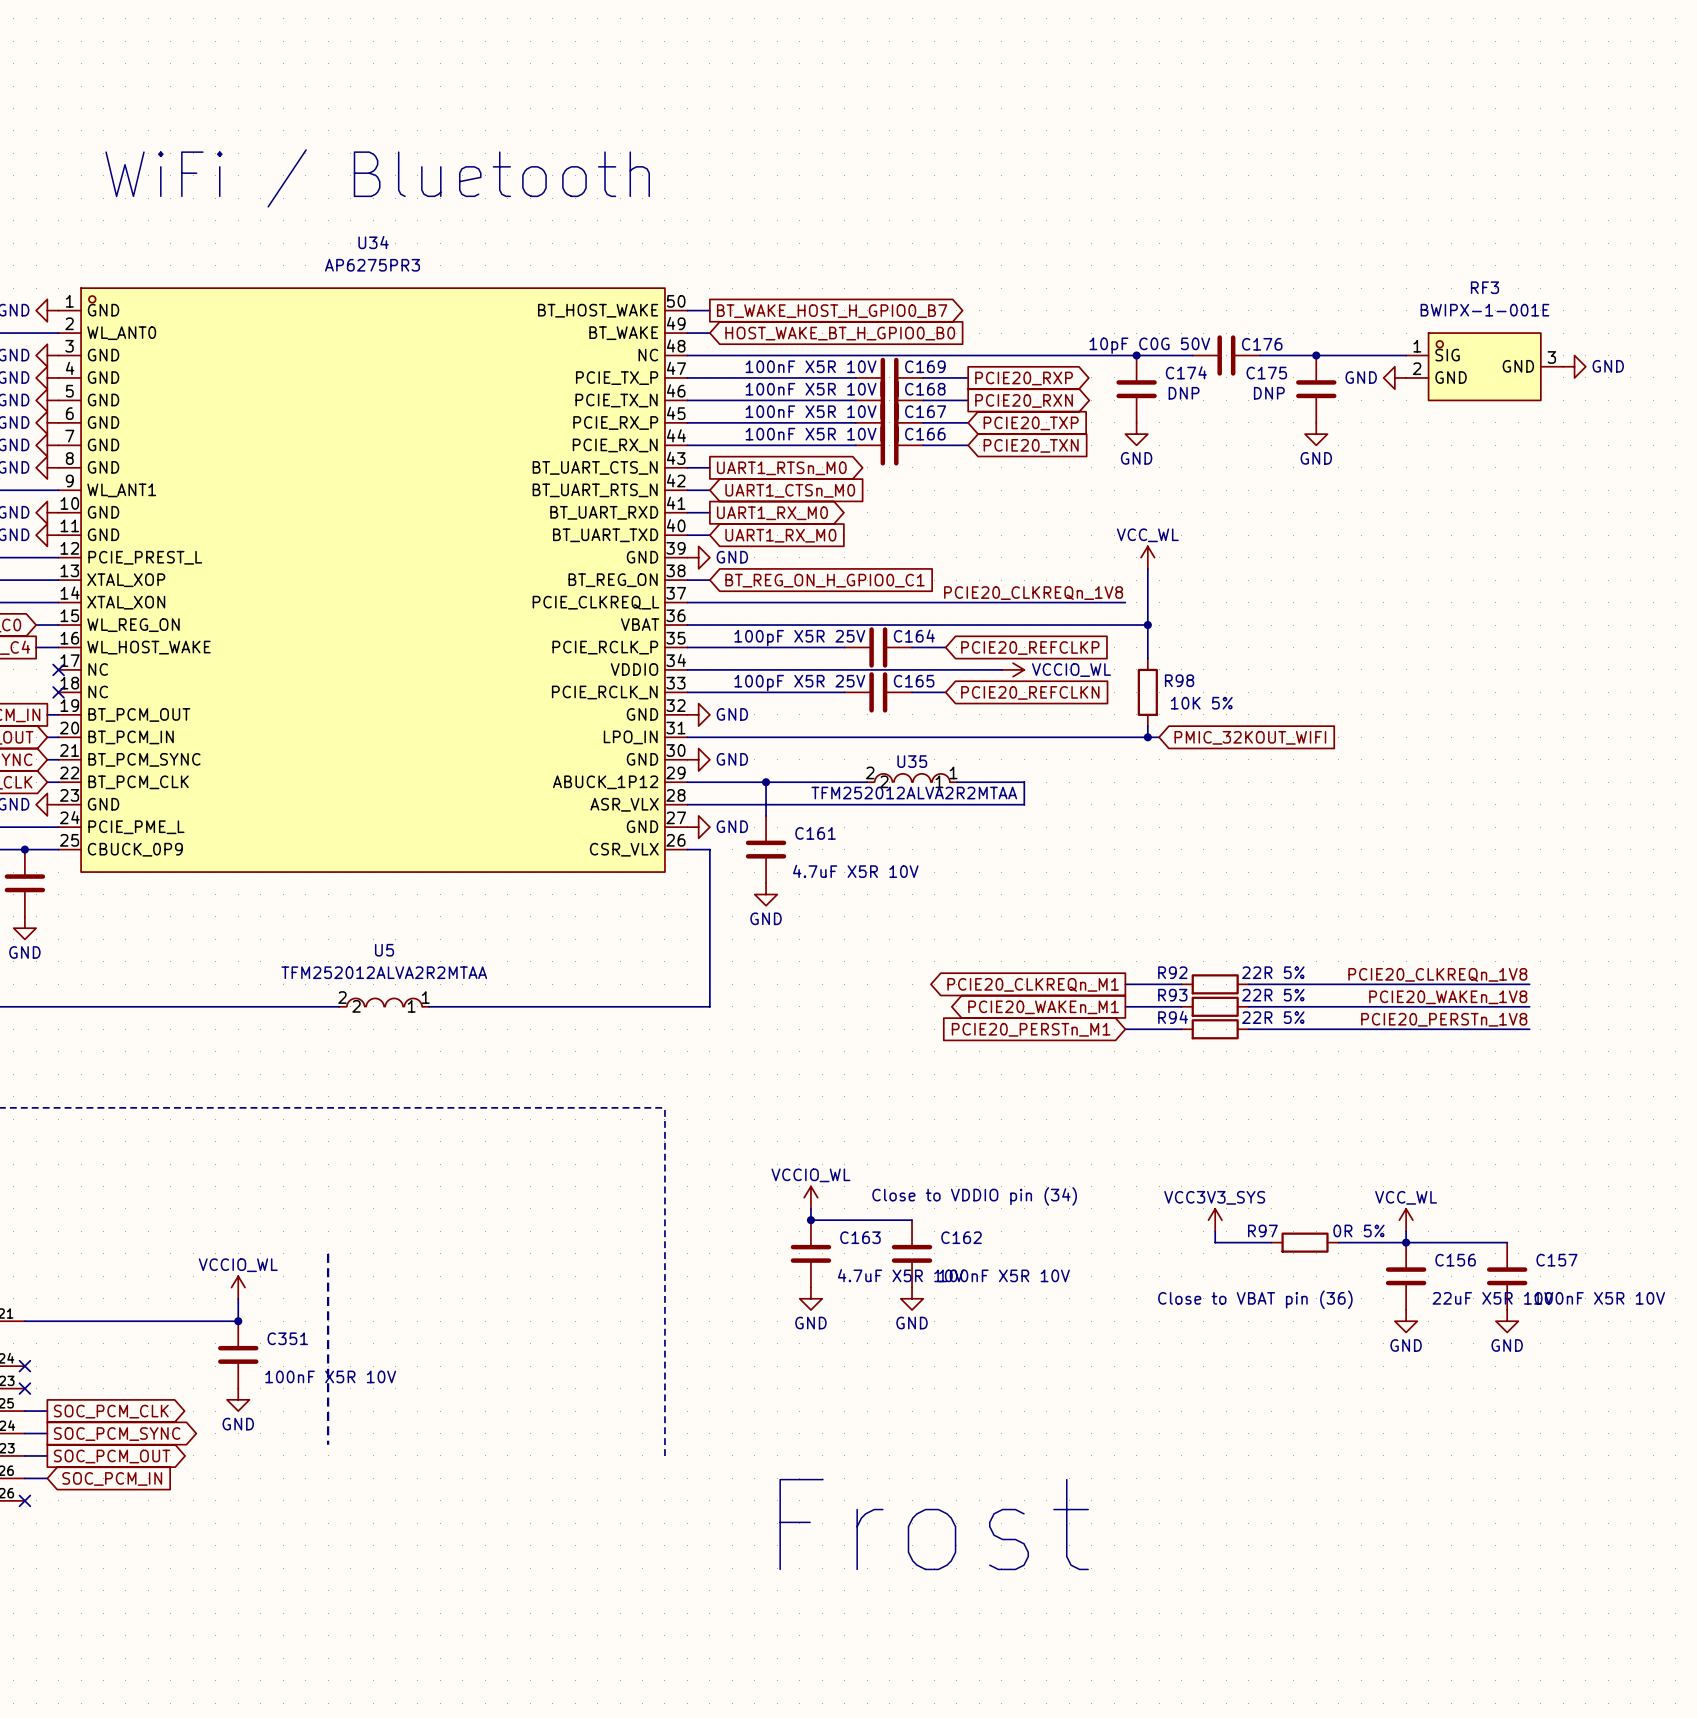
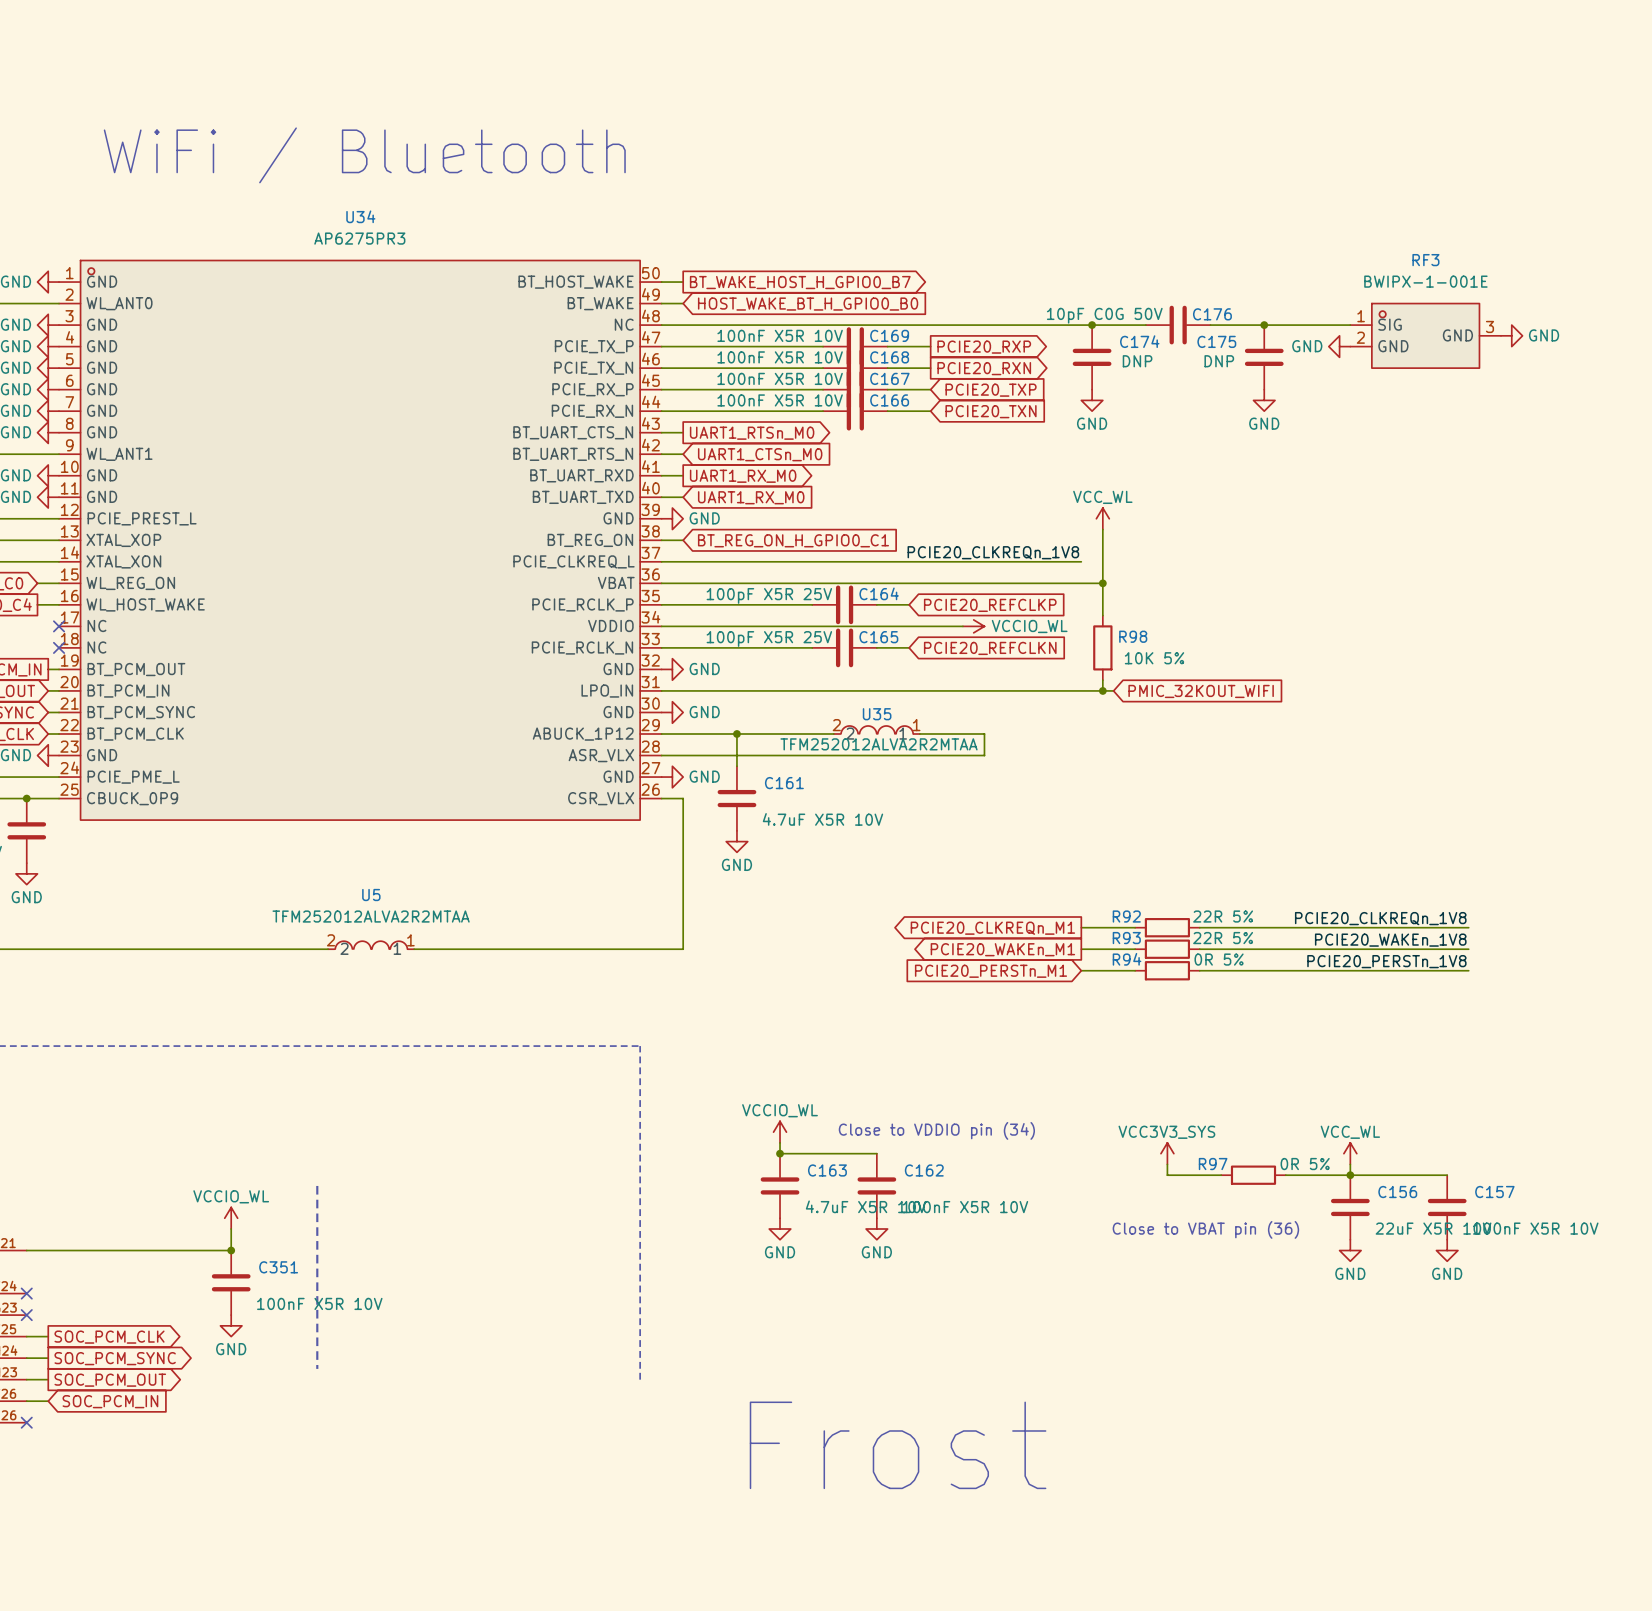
R94 value: 22R 5% (1273, 1017) -> 0R 5% (1219, 959)

